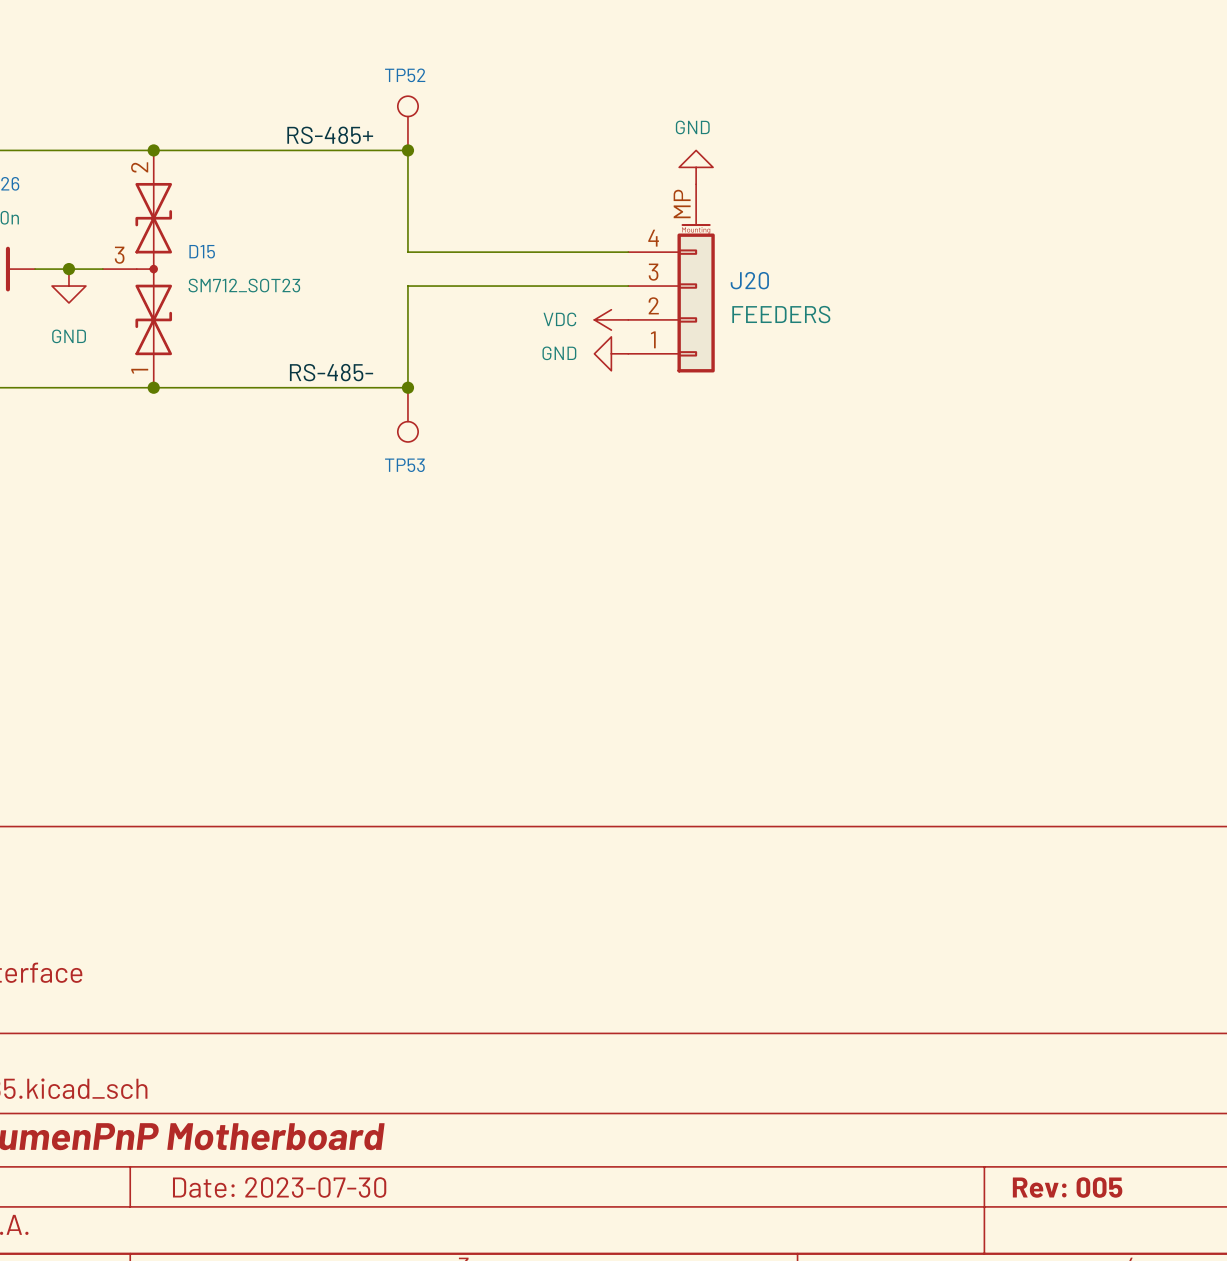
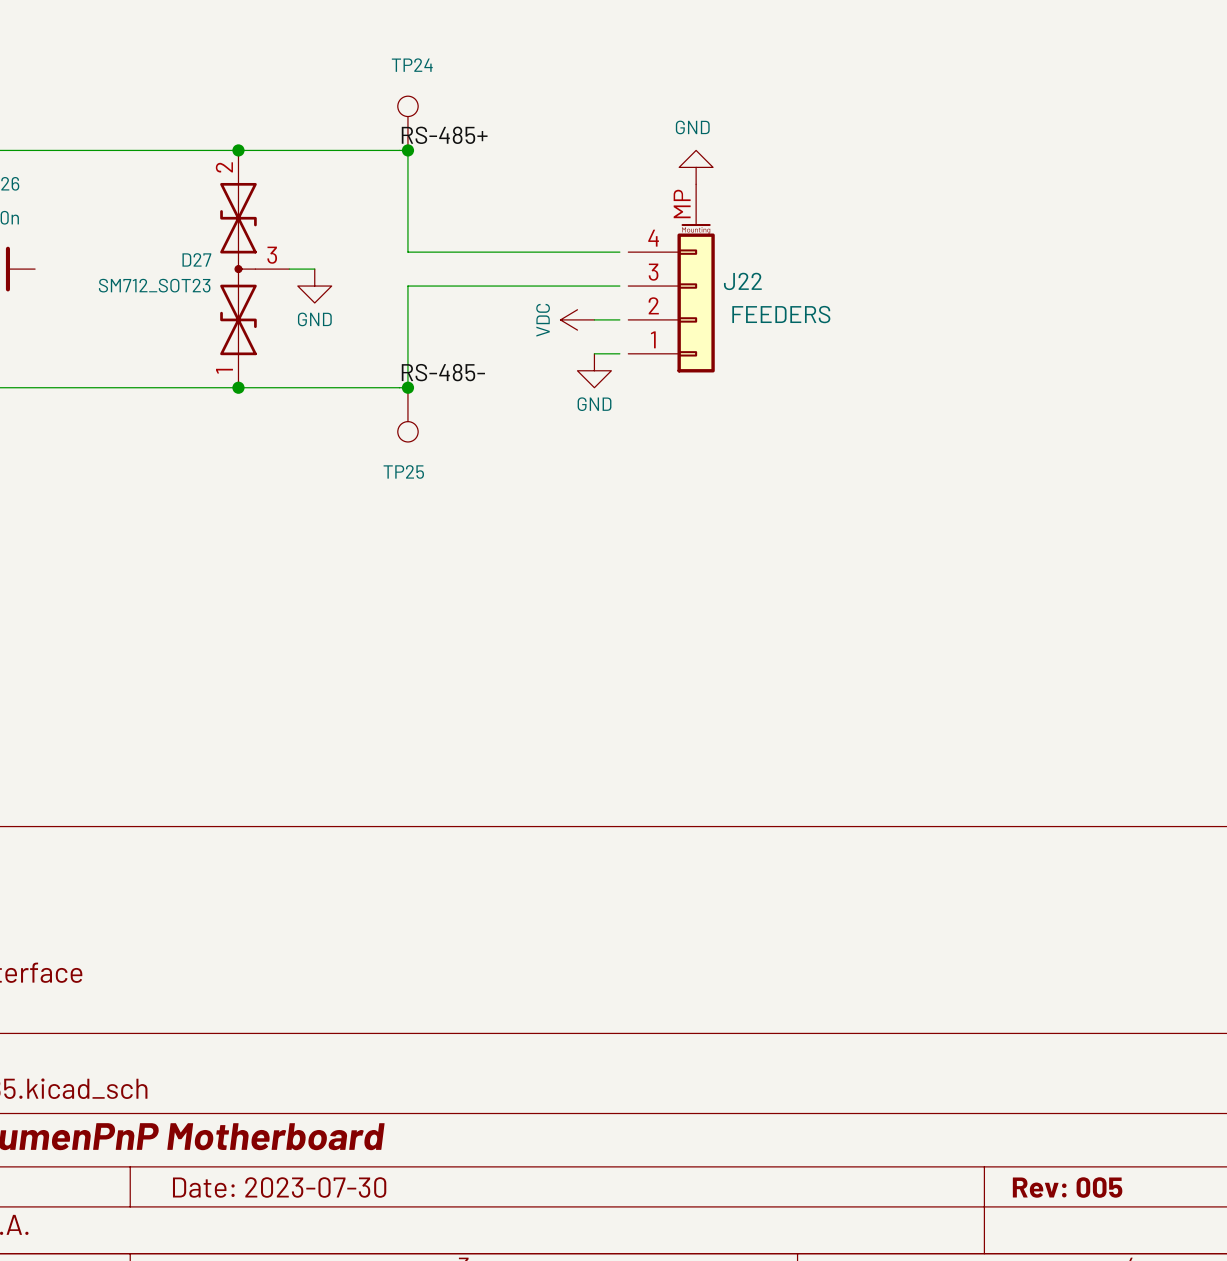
TP52 name: TP52 (405, 75) -> TP24 (412, 65)
label position: RS-485+ (330, 135) -> RS-485+ (444, 135)
junction: (153, 150) -> none
junction: none -> (238, 150)
wire: (619, 252) (628, 252) -> none
wire: (35, 269) (102, 269) -> none
junction: (68, 269) -> none
D15: SM712_SOT23 (137, 269) -> none
D27: none -> SM712_SOT23 (254, 269)
wire: none -> (289, 269) (314, 269)
J20 name: J20 (749, 280) -> J22 (742, 281)
power symbol: GND (68, 286) -> none
power symbol: none -> GND (314, 286)
wire: (619, 286) (628, 286) -> none
power symbol text rotation: 0° (559, 319) -> 90° counterclockwise (543, 320)
power symbol position: VDC (611, 319) -> VDC (577, 319)
wire: none -> (594, 353) (619, 353)
power symbol rotation: 0° (611, 353) -> 90° counterclockwise (594, 370)
power symbol position: GND (611, 353) -> GND (594, 370)
label position: RS-485- (331, 372) -> RS-485- (443, 372)
junction: (153, 387) -> none
junction: none -> (238, 387)
TP53 name: TP53 (404, 465) -> TP25 (403, 471)

